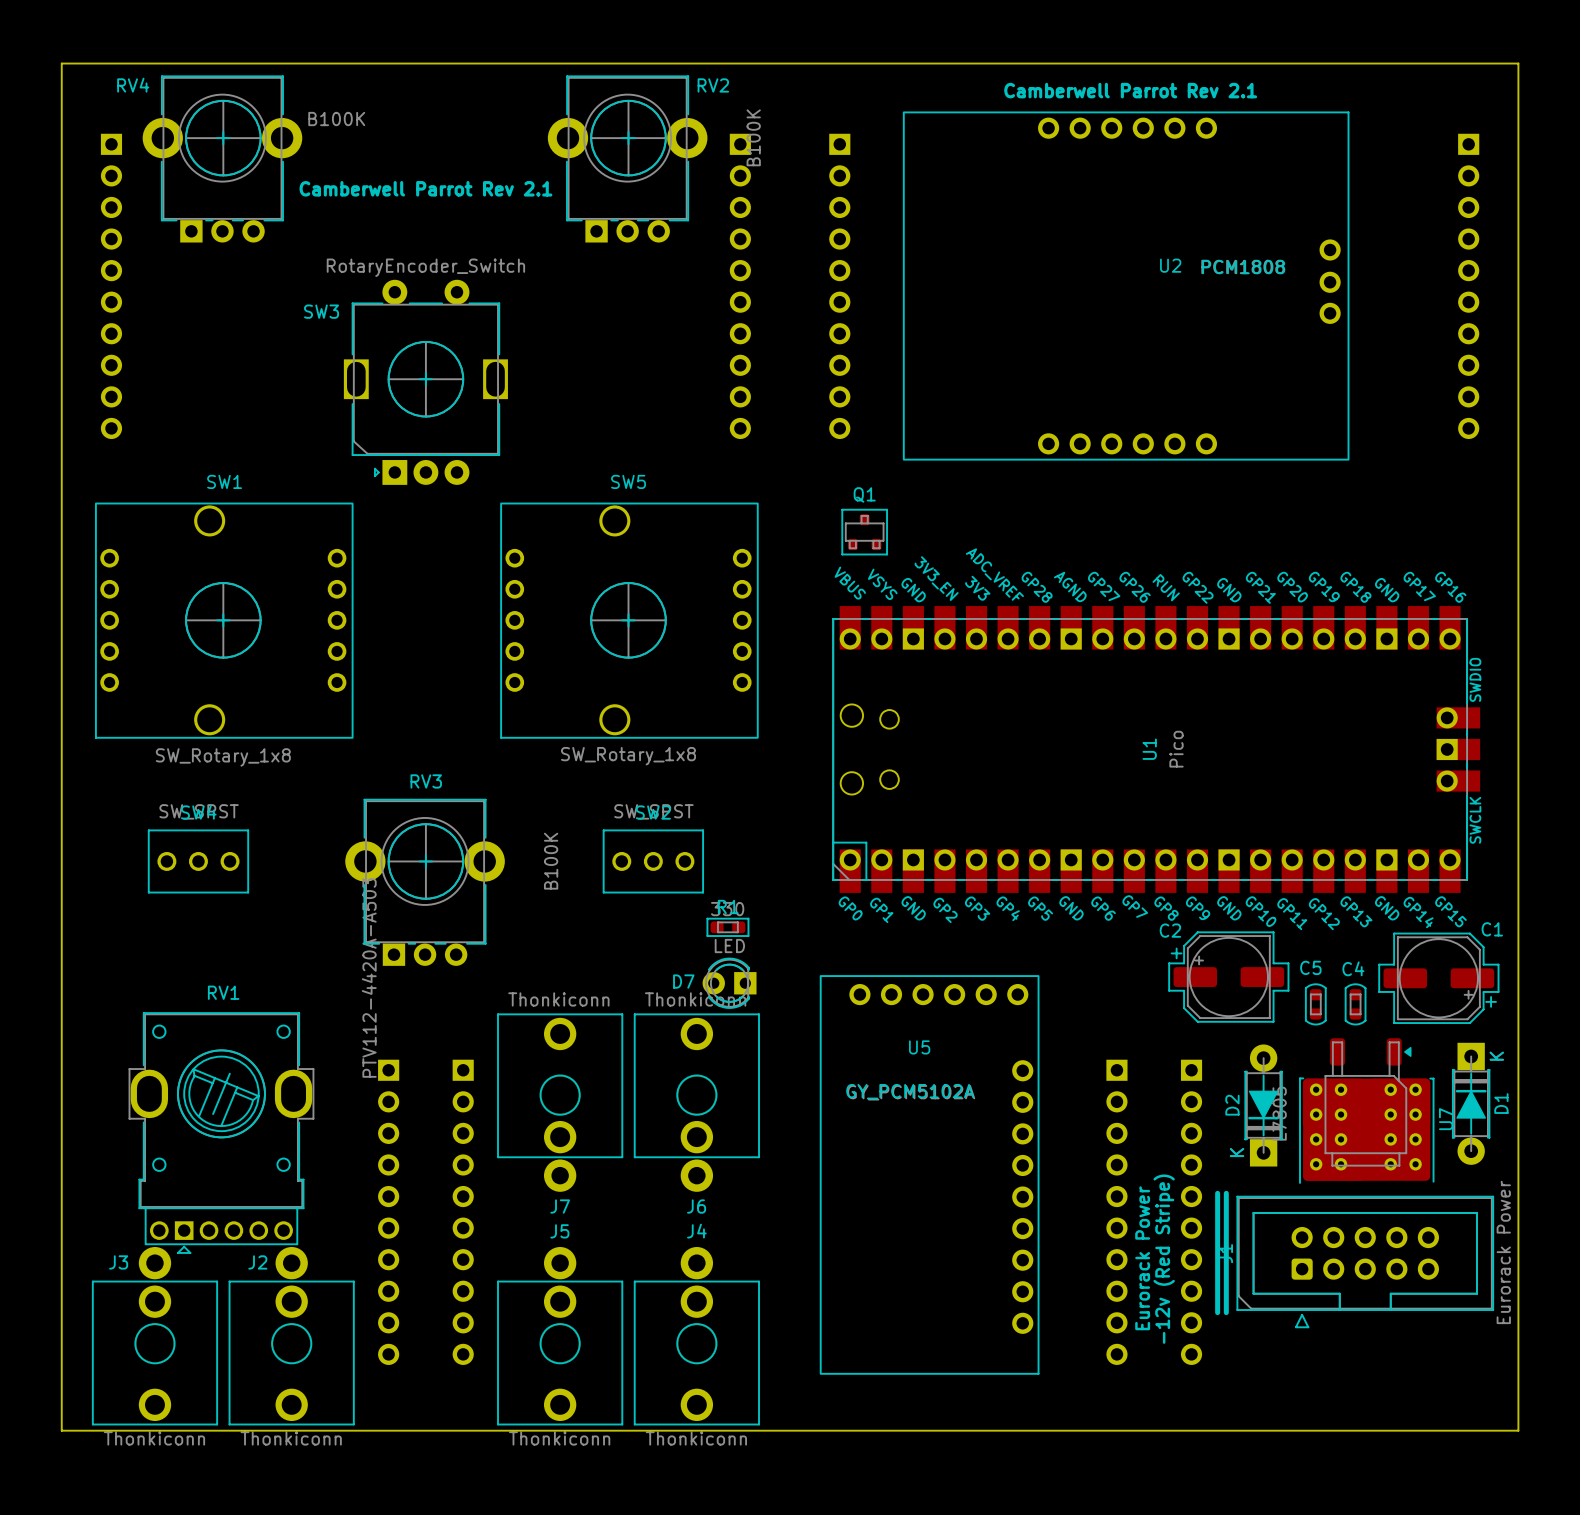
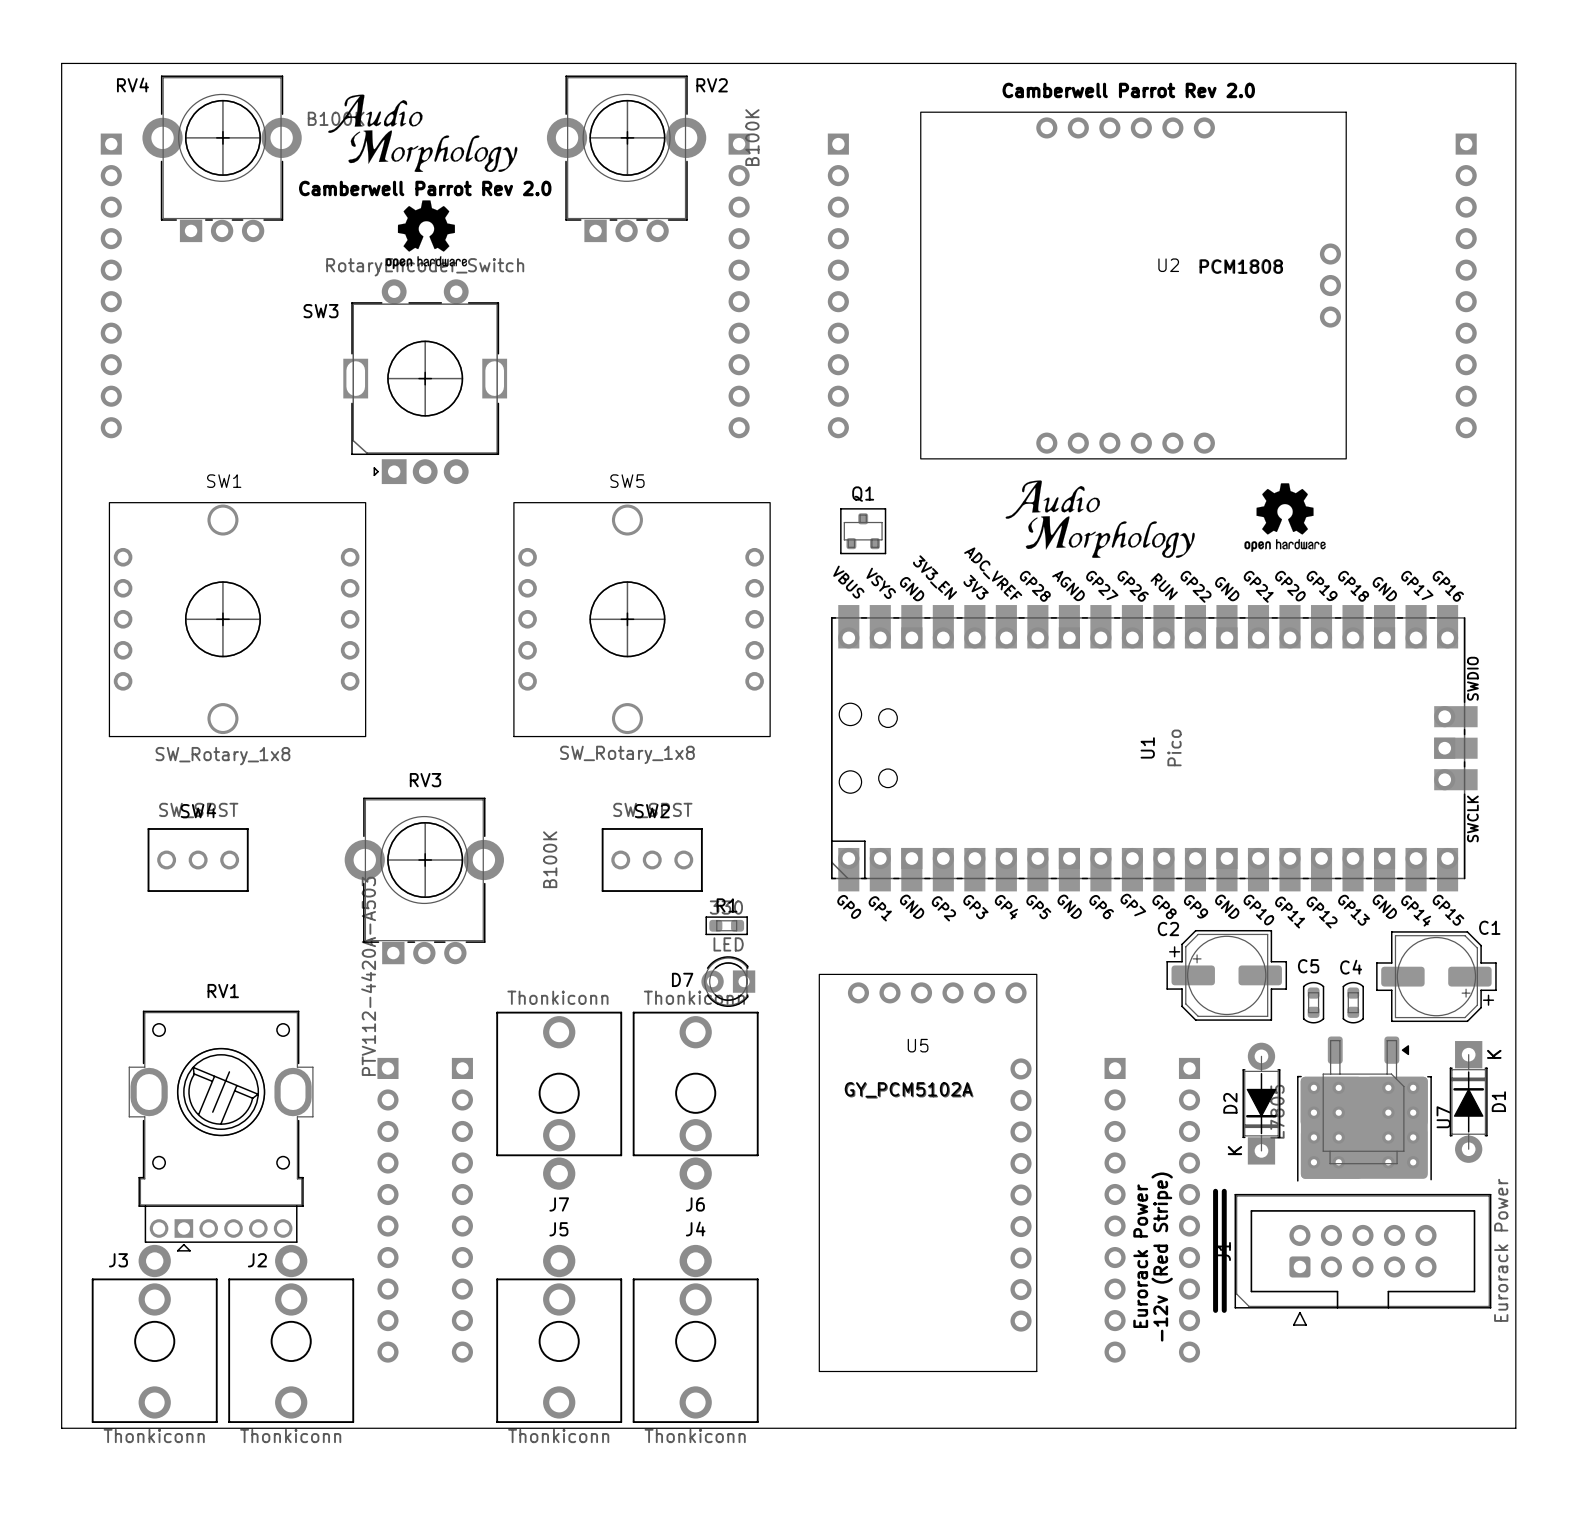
text: Camberwell Parrot Rev 2.1 (1130, 90) -> Camberwell Parrot Rev 2.0 (1128, 90)
drawing: none -> [328, 94, 518, 173]
U2 footprint: [903, 112, 1349, 460] -> [920, 111, 1347, 460]
text: Camberwell Parrot Rev 2.1 (425, 188) -> Camberwell Parrot Rev 2.0 (425, 188)
drawing: none -> [385, 200, 468, 270]
drawing: none -> [1005, 480, 1195, 558]
drawing: none -> [1244, 483, 1326, 553]
SW1 footprint: [95, 502, 354, 739] -> [108, 502, 367, 738]
SW5 footprint: [500, 502, 759, 739] -> [513, 502, 771, 738]

